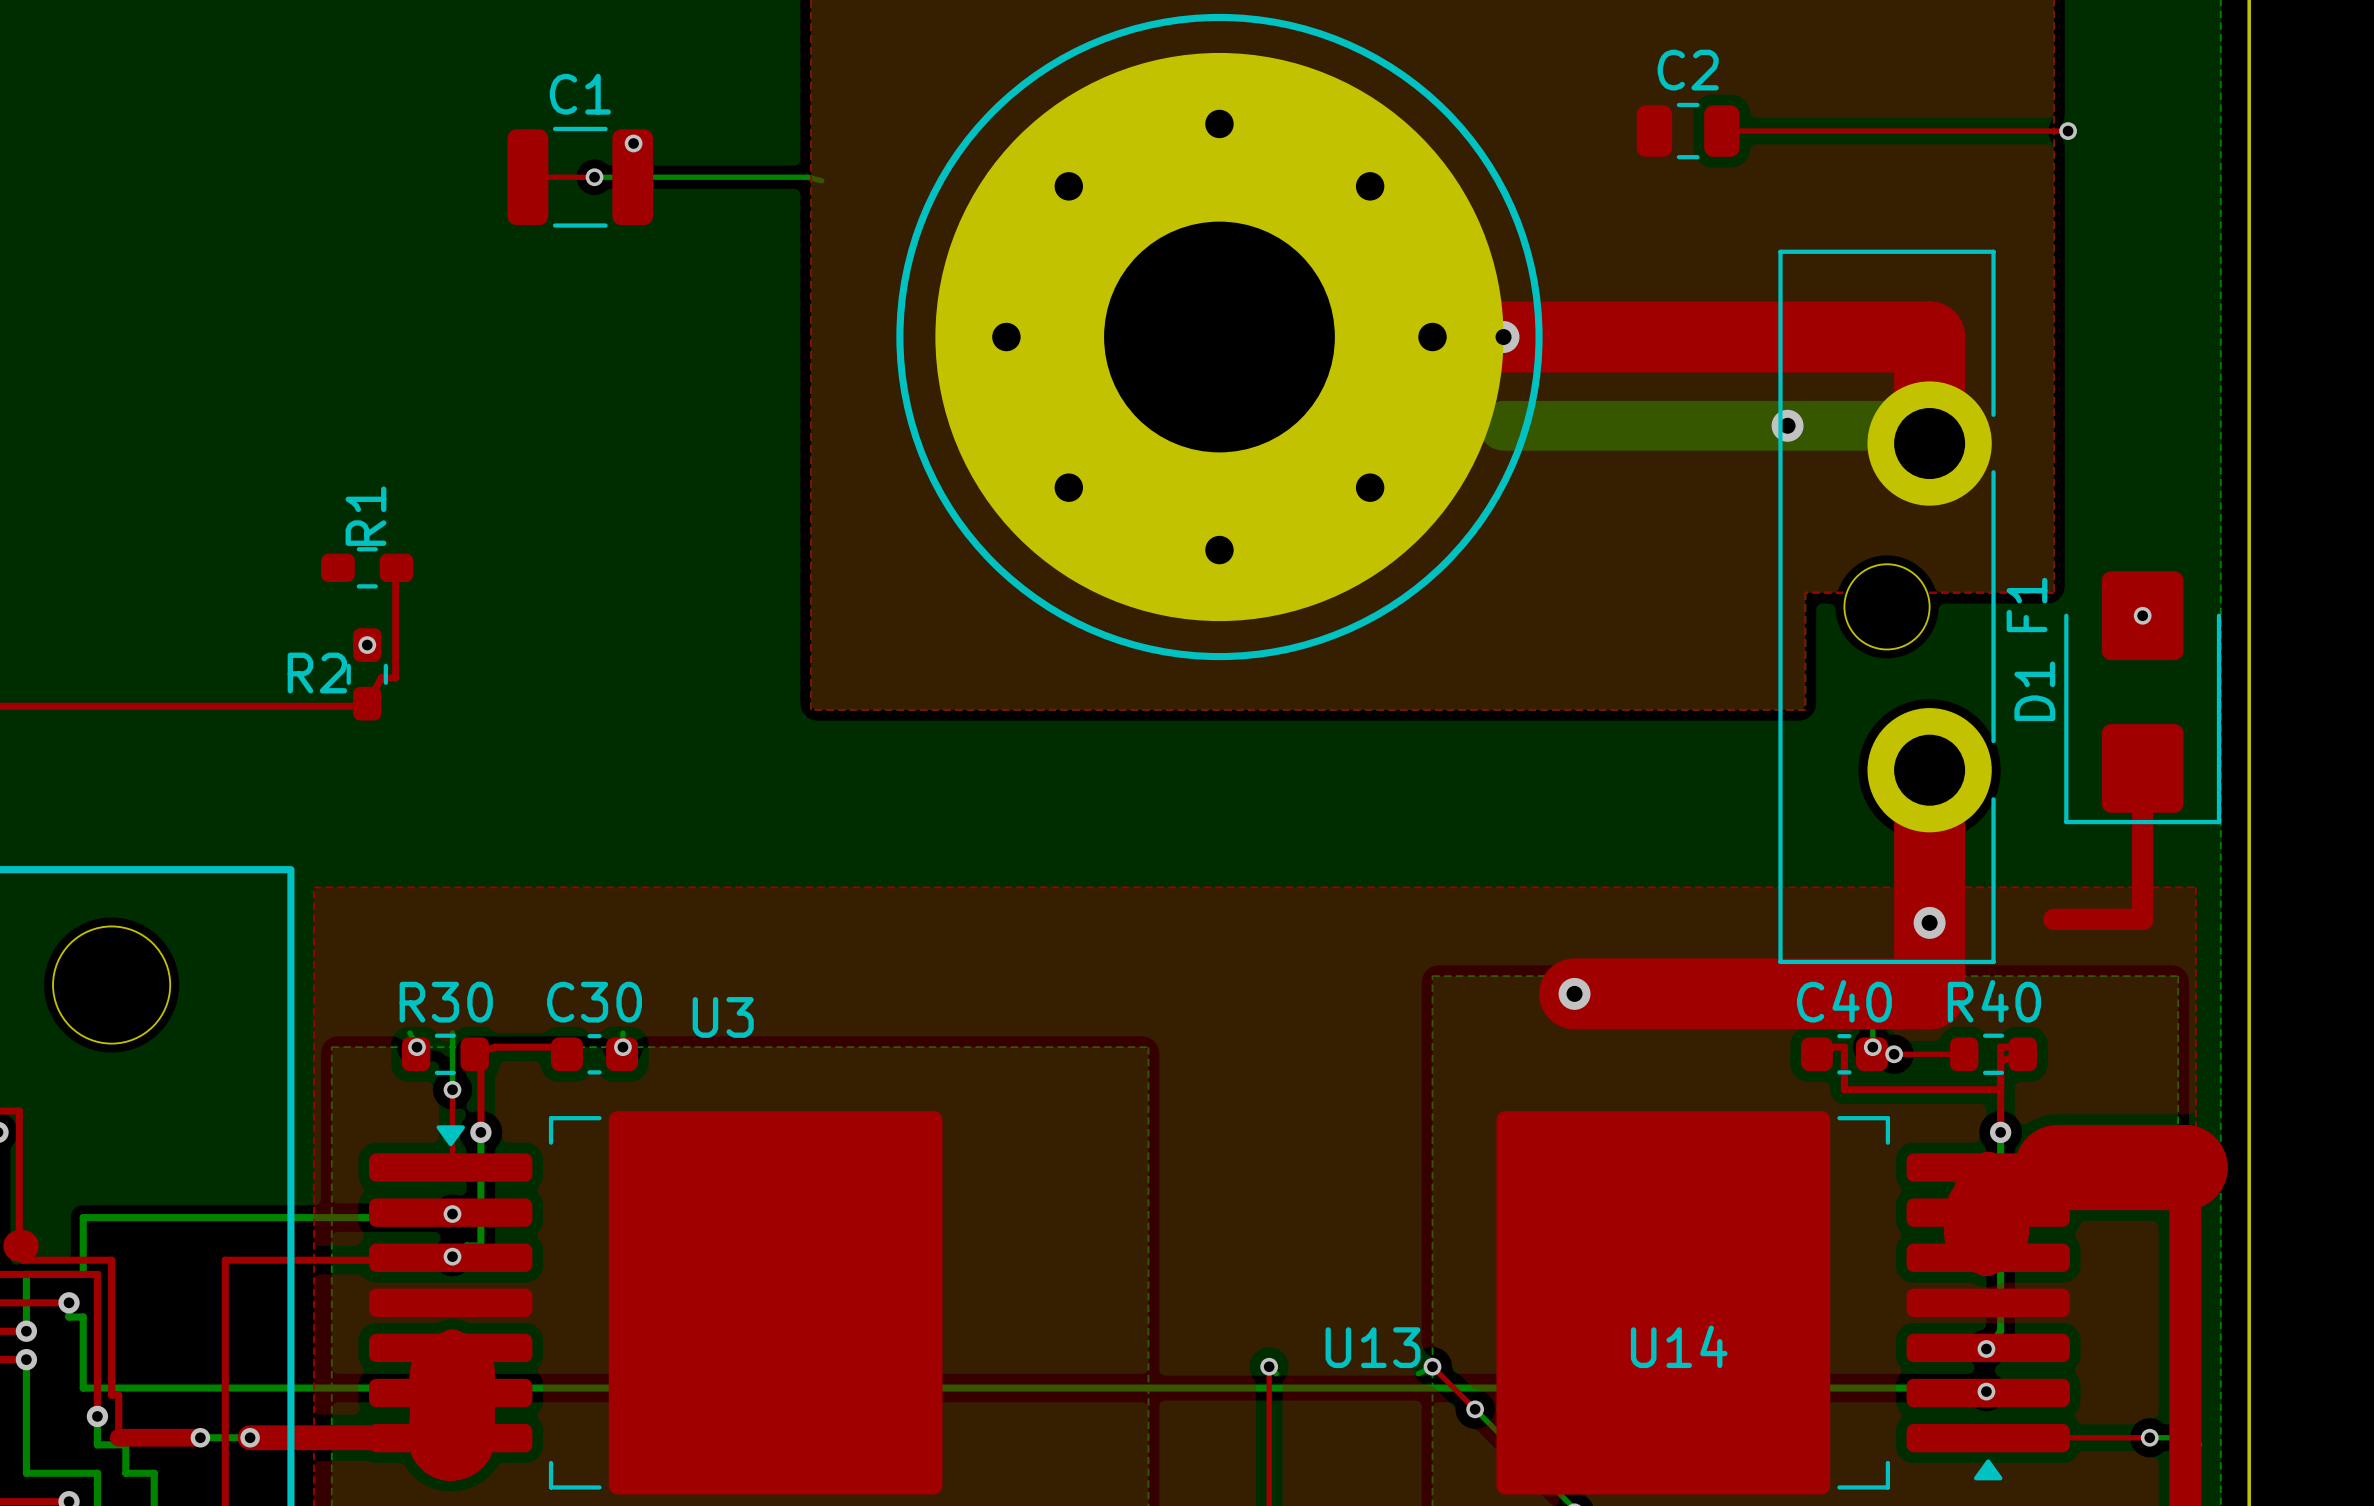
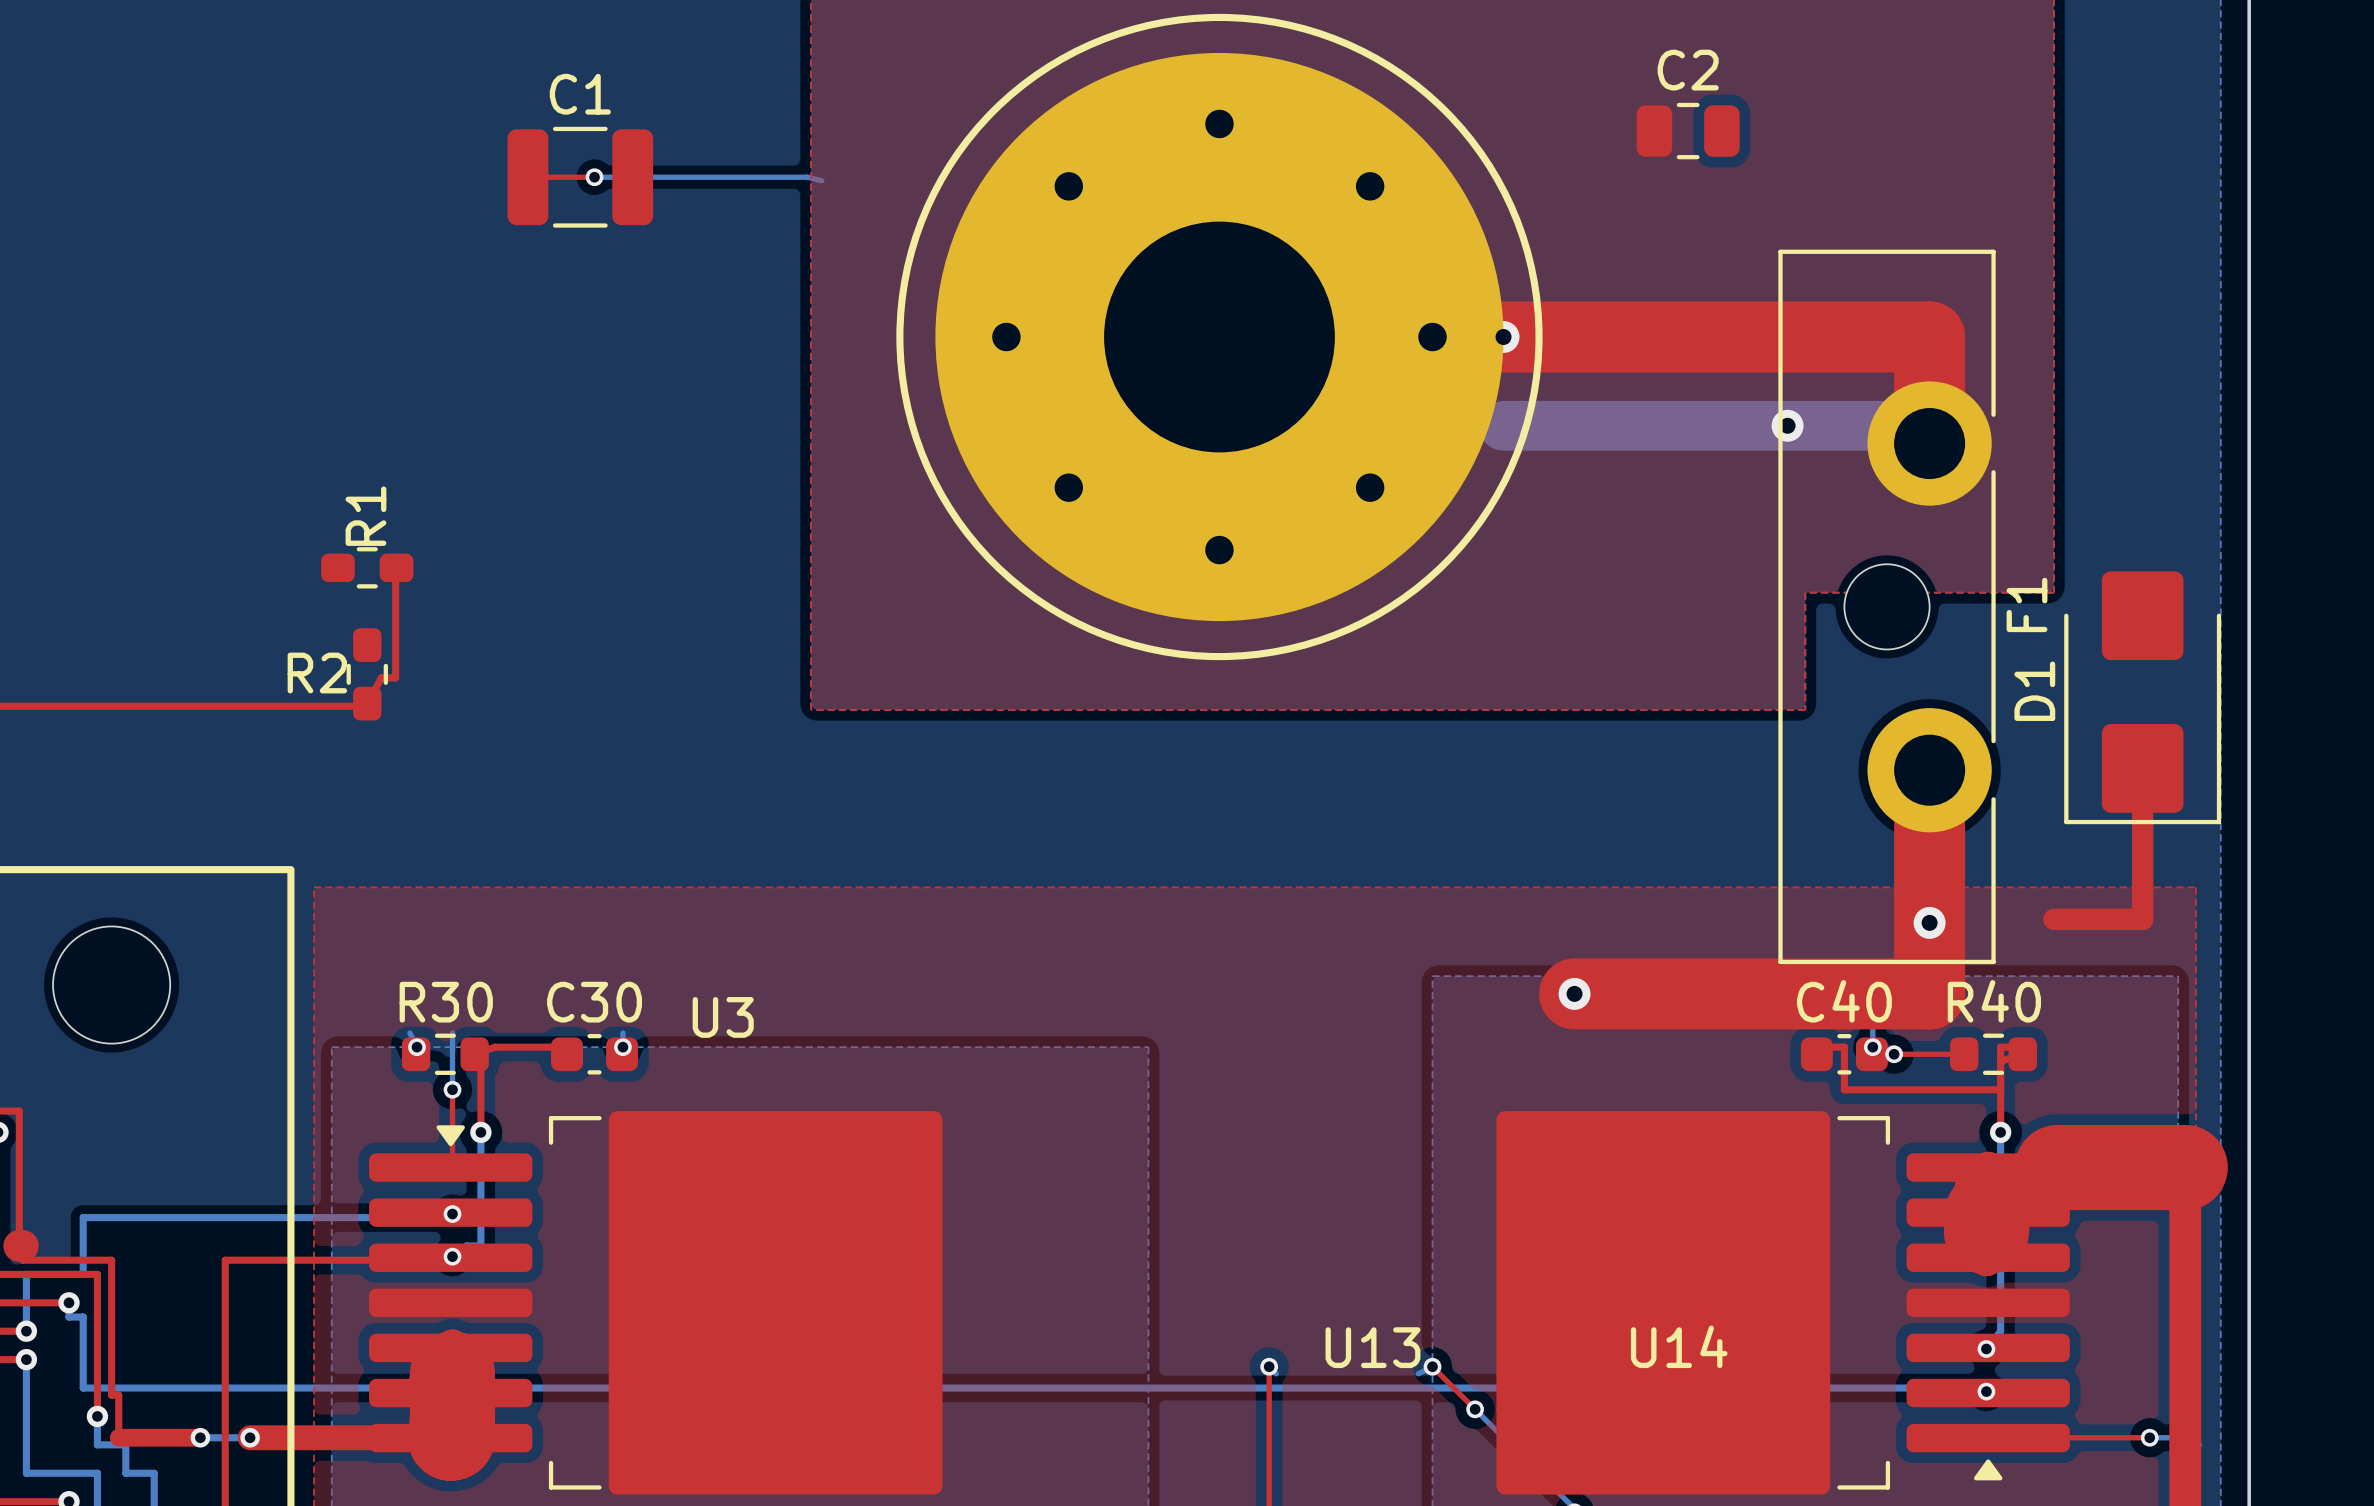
top track: (1721, 131) (2068, 131) -> none
via: (2068, 131) -> none
via: (633, 143) -> none
via: (2142, 615) -> none
via: (367, 645) -> none

